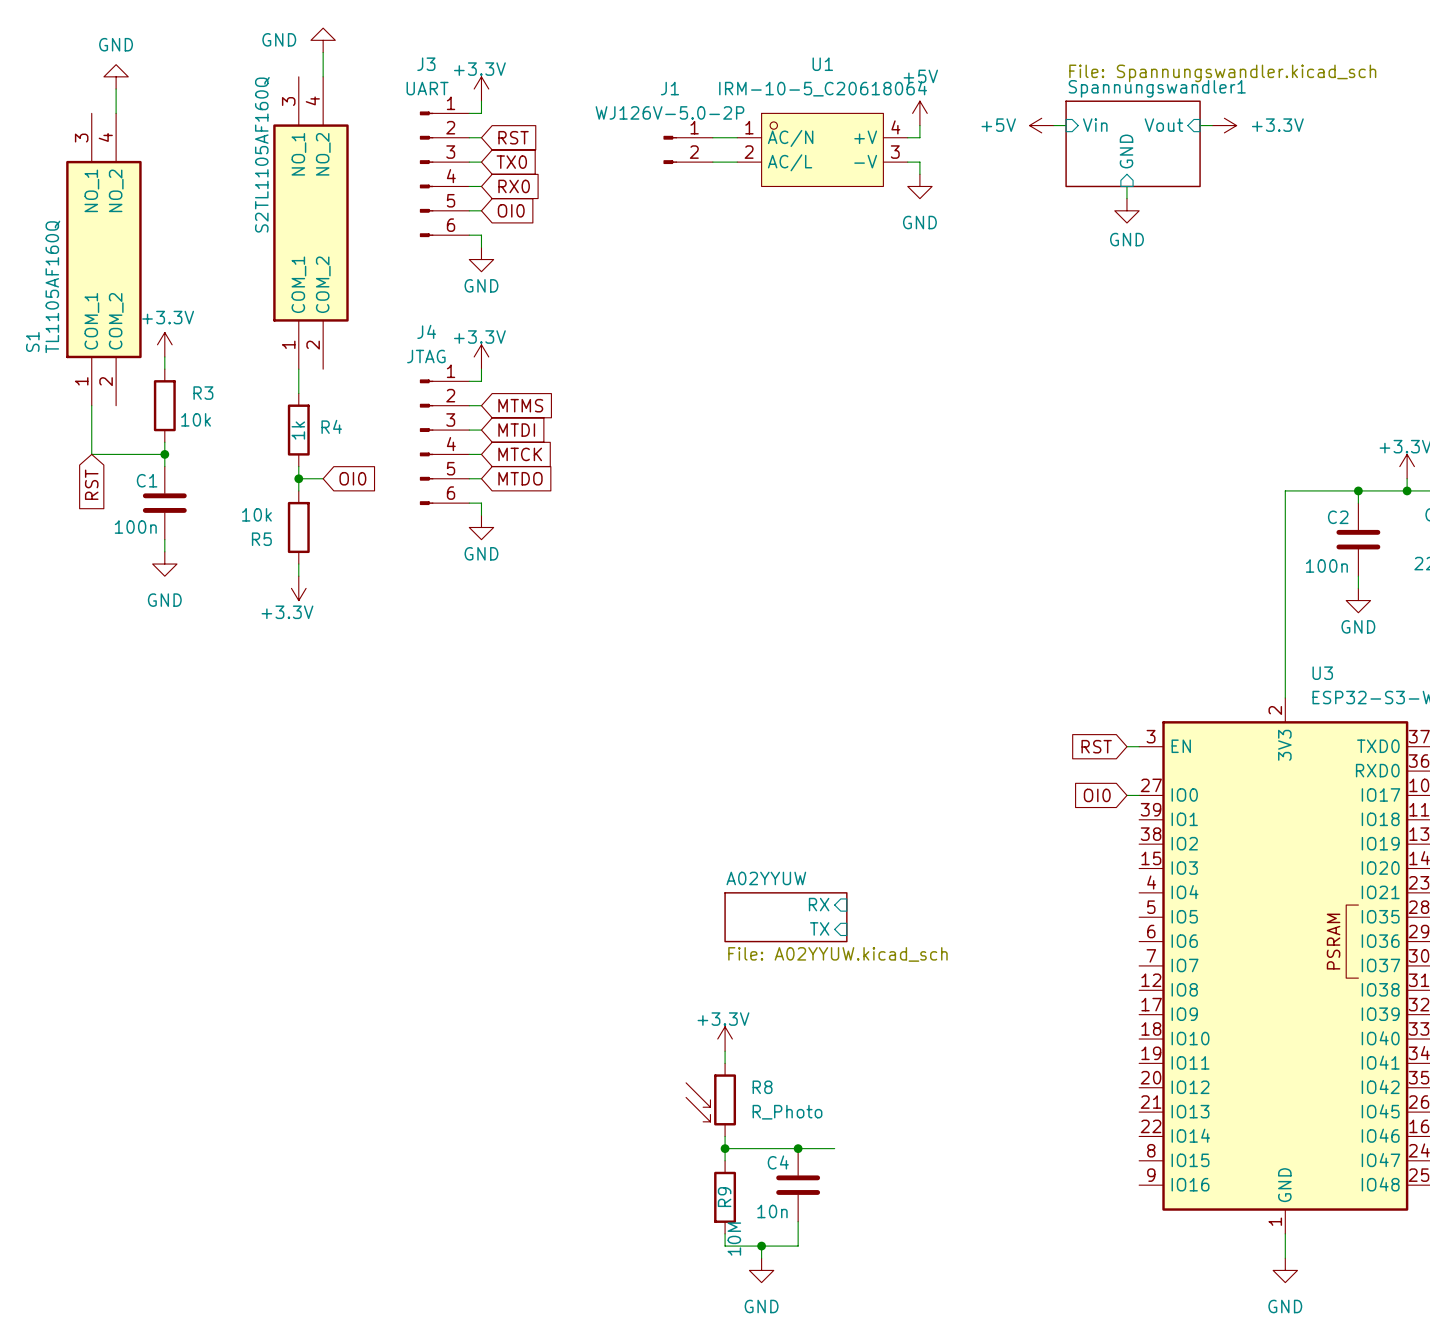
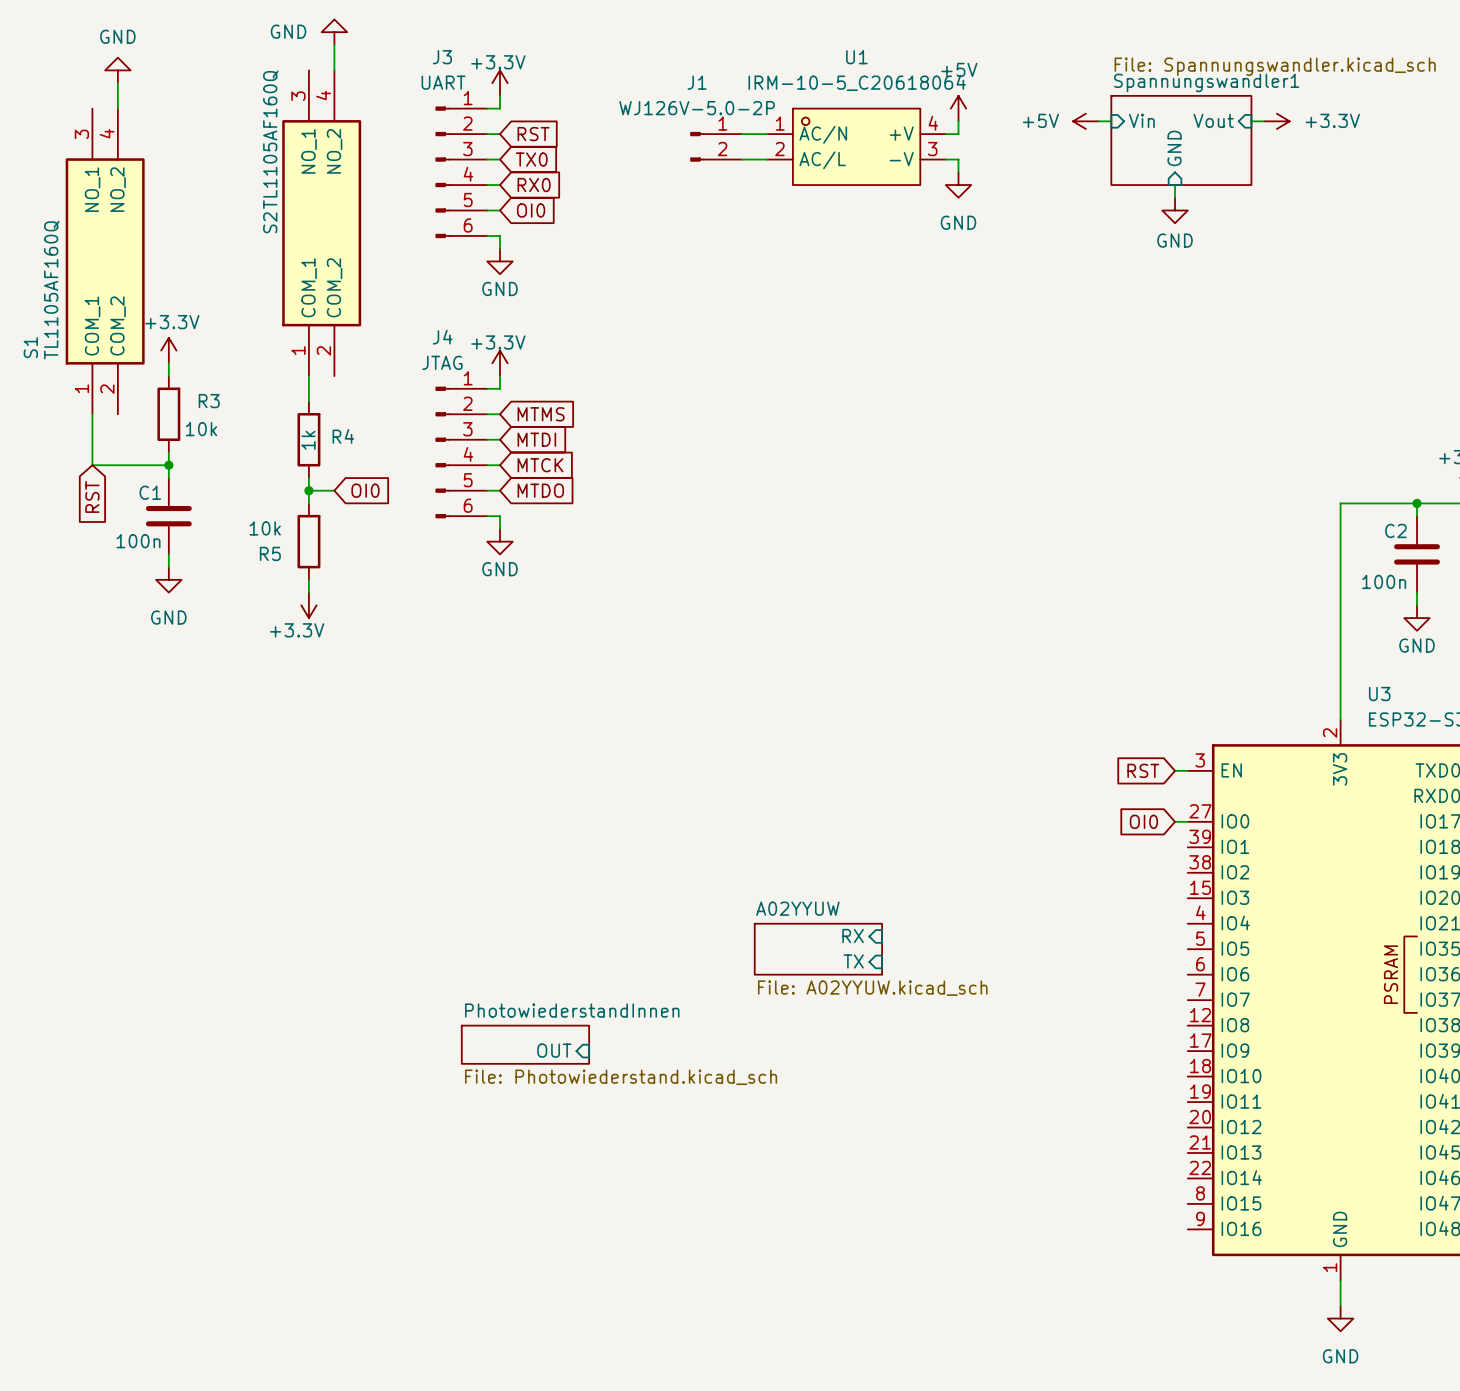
sheet PhotowiederstandInnen: none -> File: Photowiederstand.kicad_sch (525, 1044)
sheet pin: none -> OUT (554, 1050)
power symbol: +3.3V (725, 1039) -> none
wire: (725, 1051) (725, 1063) -> none
R8: R_Photo (711, 1099) -> none
wire: (725, 1136) (725, 1160) -> none
wire: (725, 1148) (834, 1148) -> none
junction: (725, 1148) -> none
junction: (798, 1148) -> none
C4: 10n (798, 1185) -> none
R9: 10M (725, 1197) -> none
wire: (798, 1221) (798, 1246) (725, 1246) (725, 1233) -> none
wire: (761, 1246) (761, 1258) -> none
junction: (761, 1246) -> none
power symbol: GND (761, 1270) -> none

